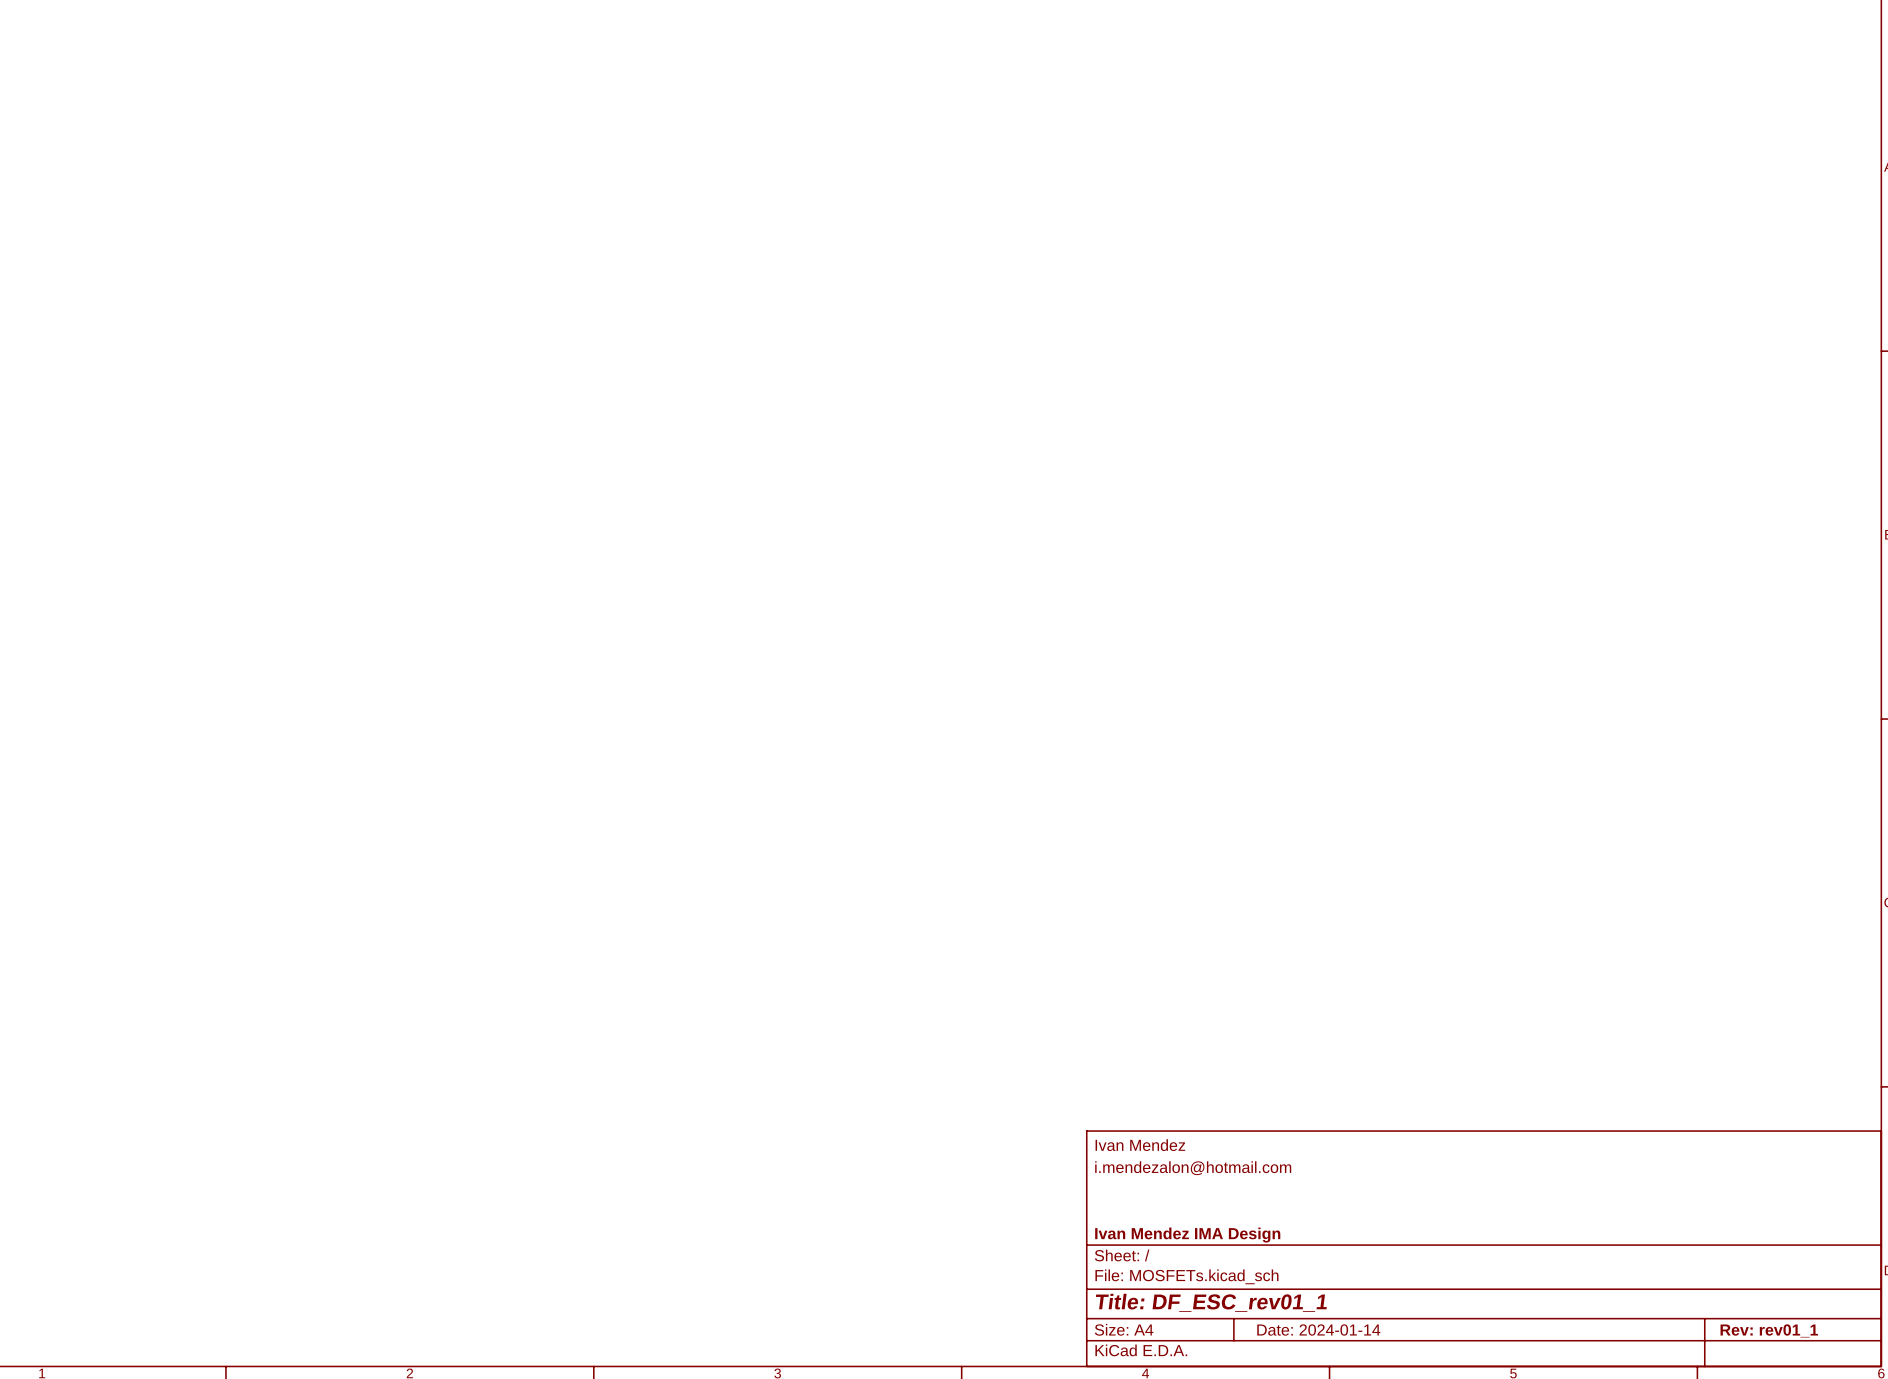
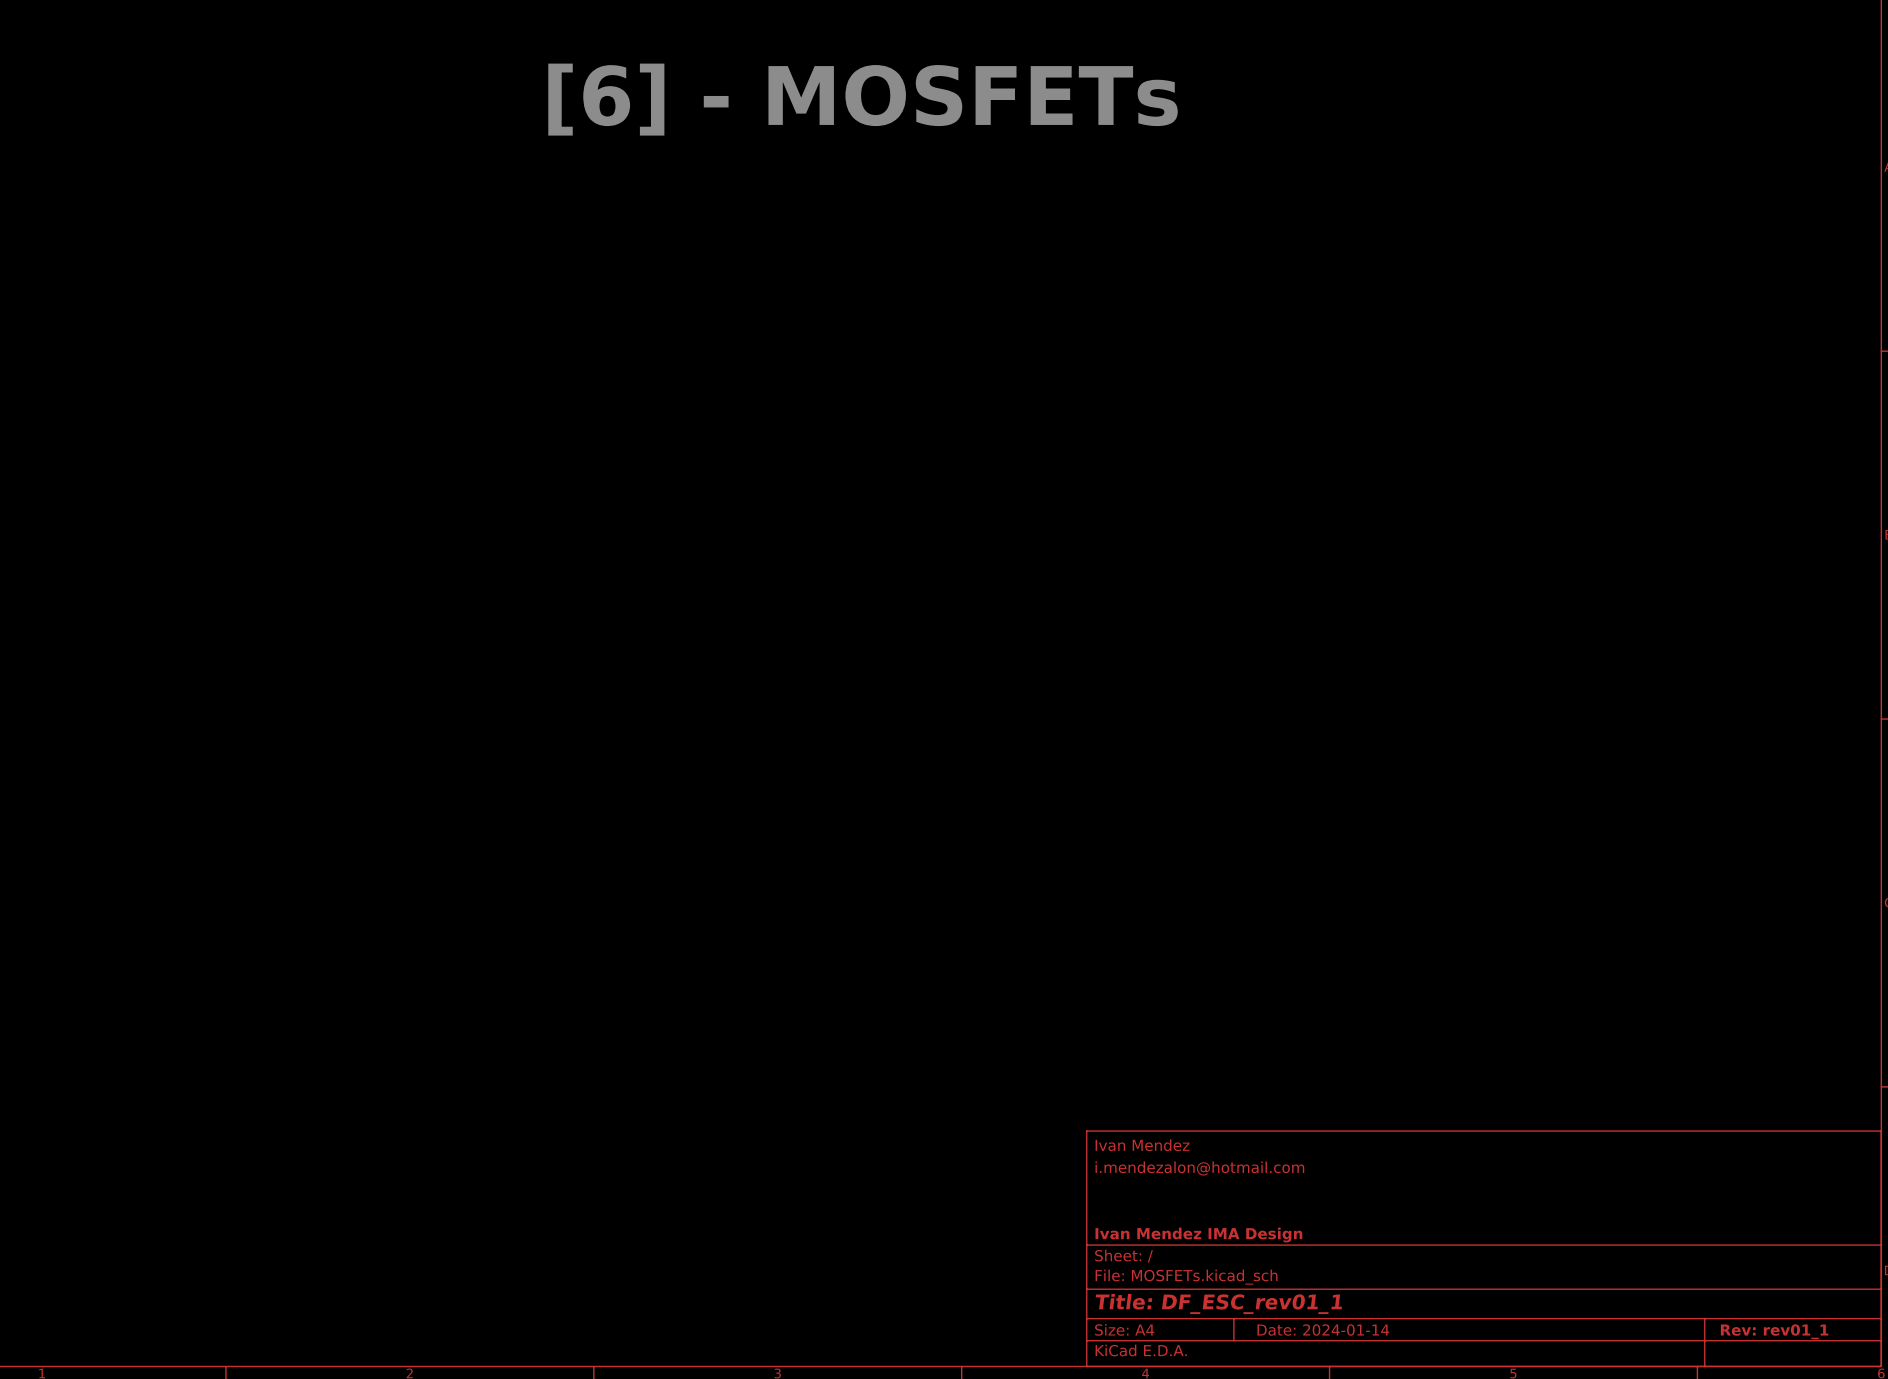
text: none -> [6] - MOSFETs (863, 99)

